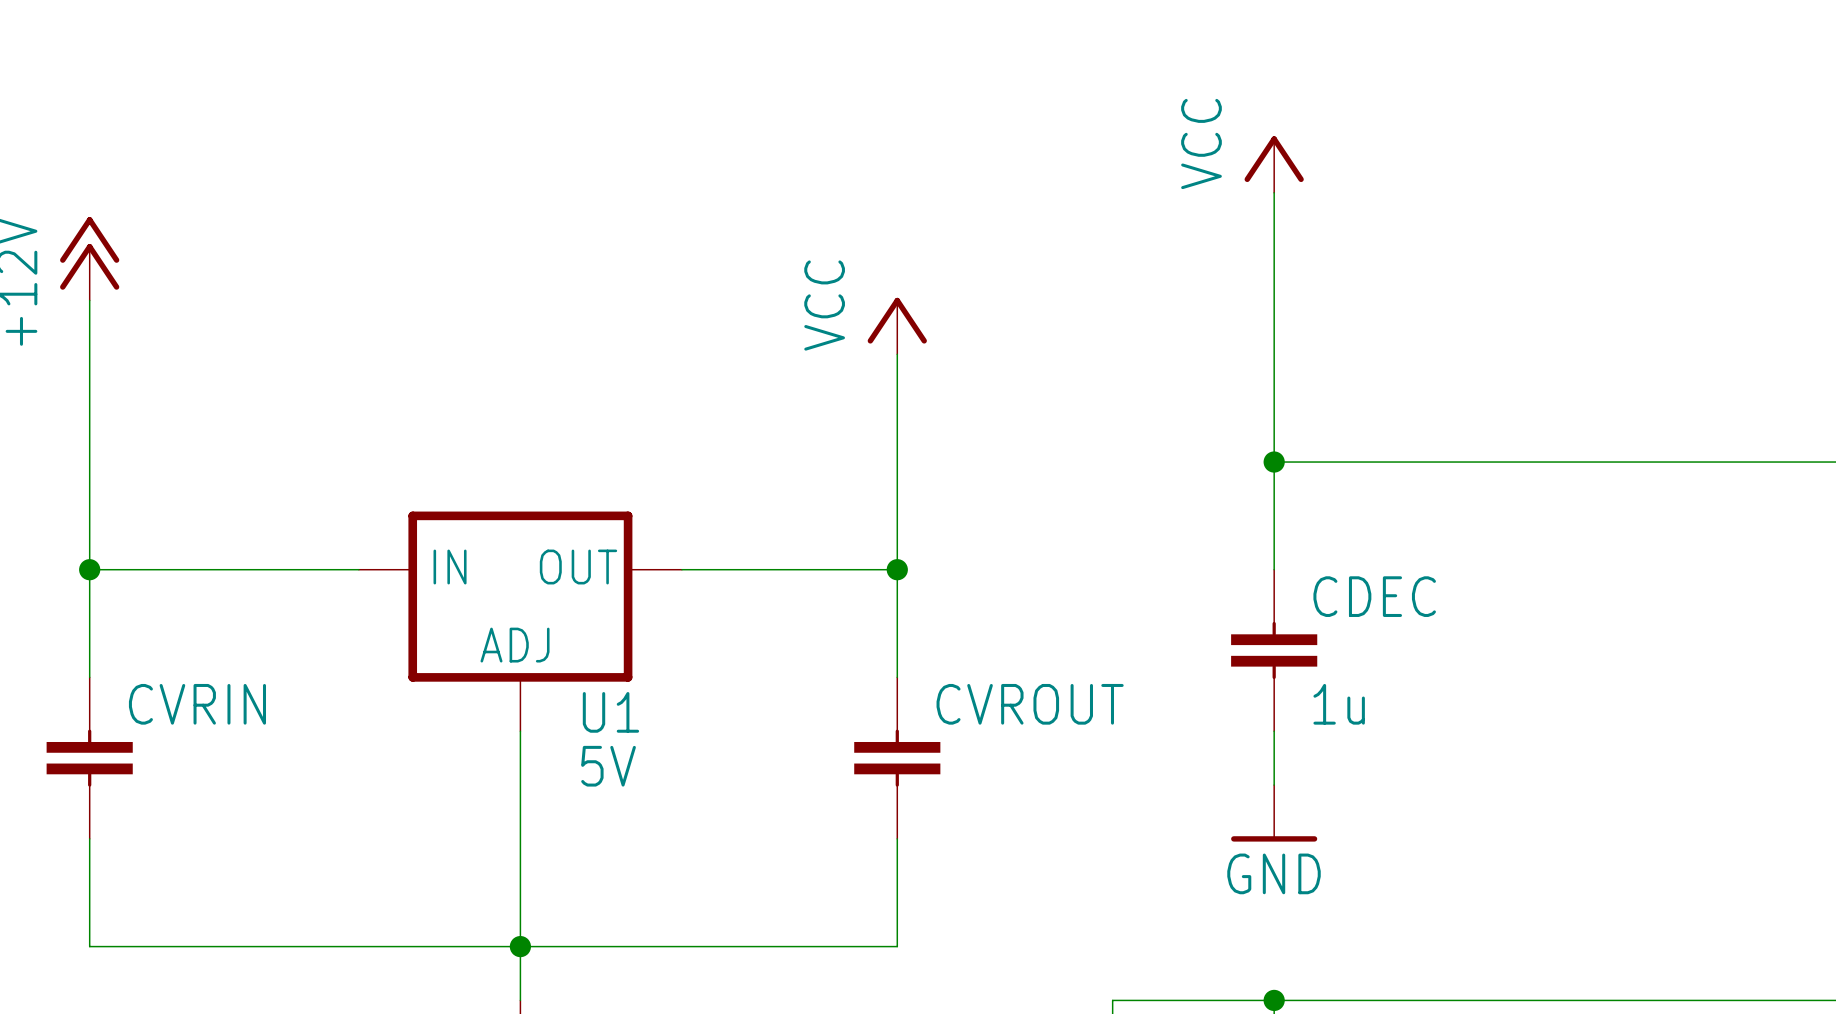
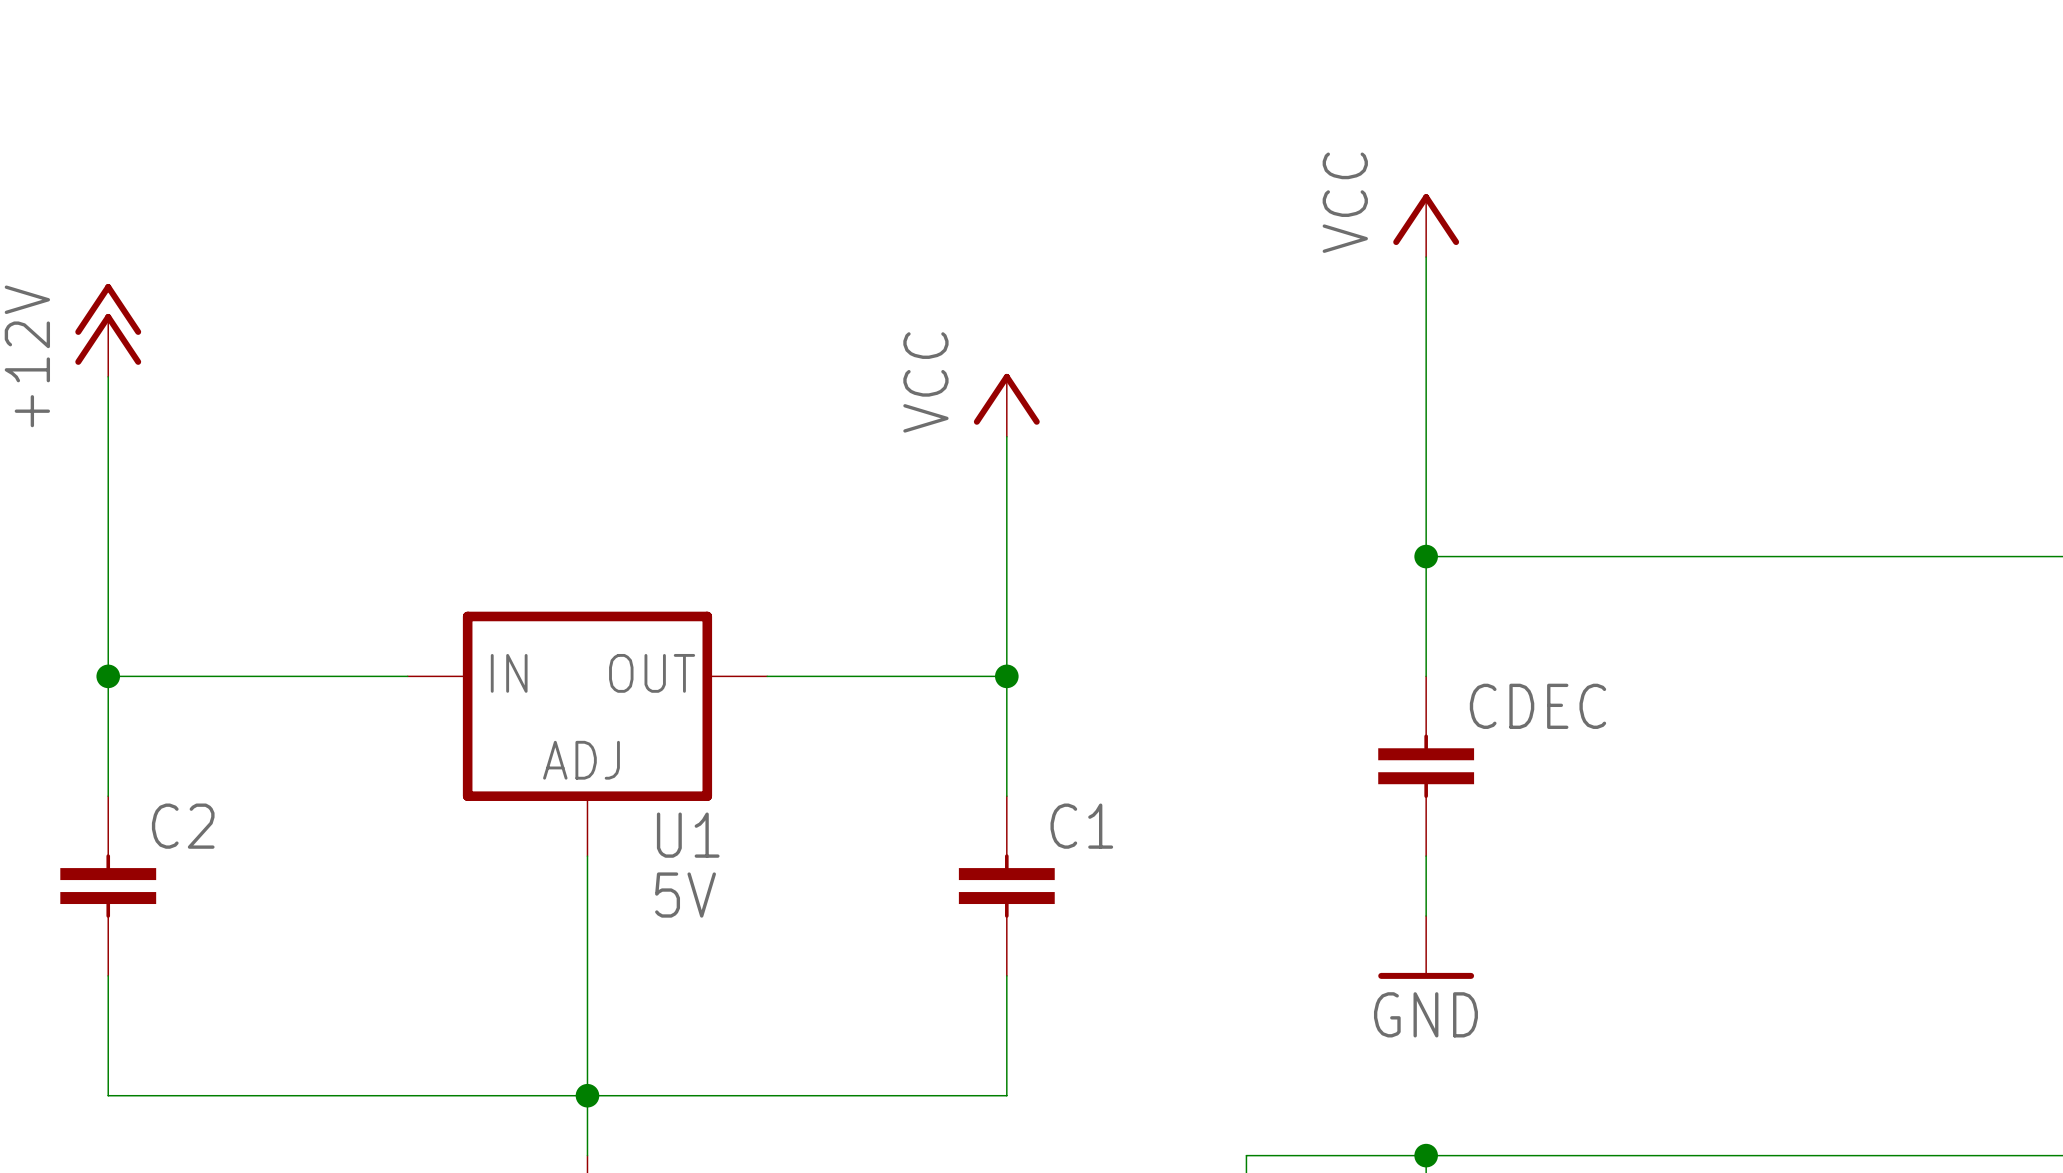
CVRIN name: CVRIN (197, 704) -> C2 (183, 826)
CVROUT name: CVROUT (1030, 704) -> C1 (1081, 826)
CDEC value: 1u (1339, 704) -> none

